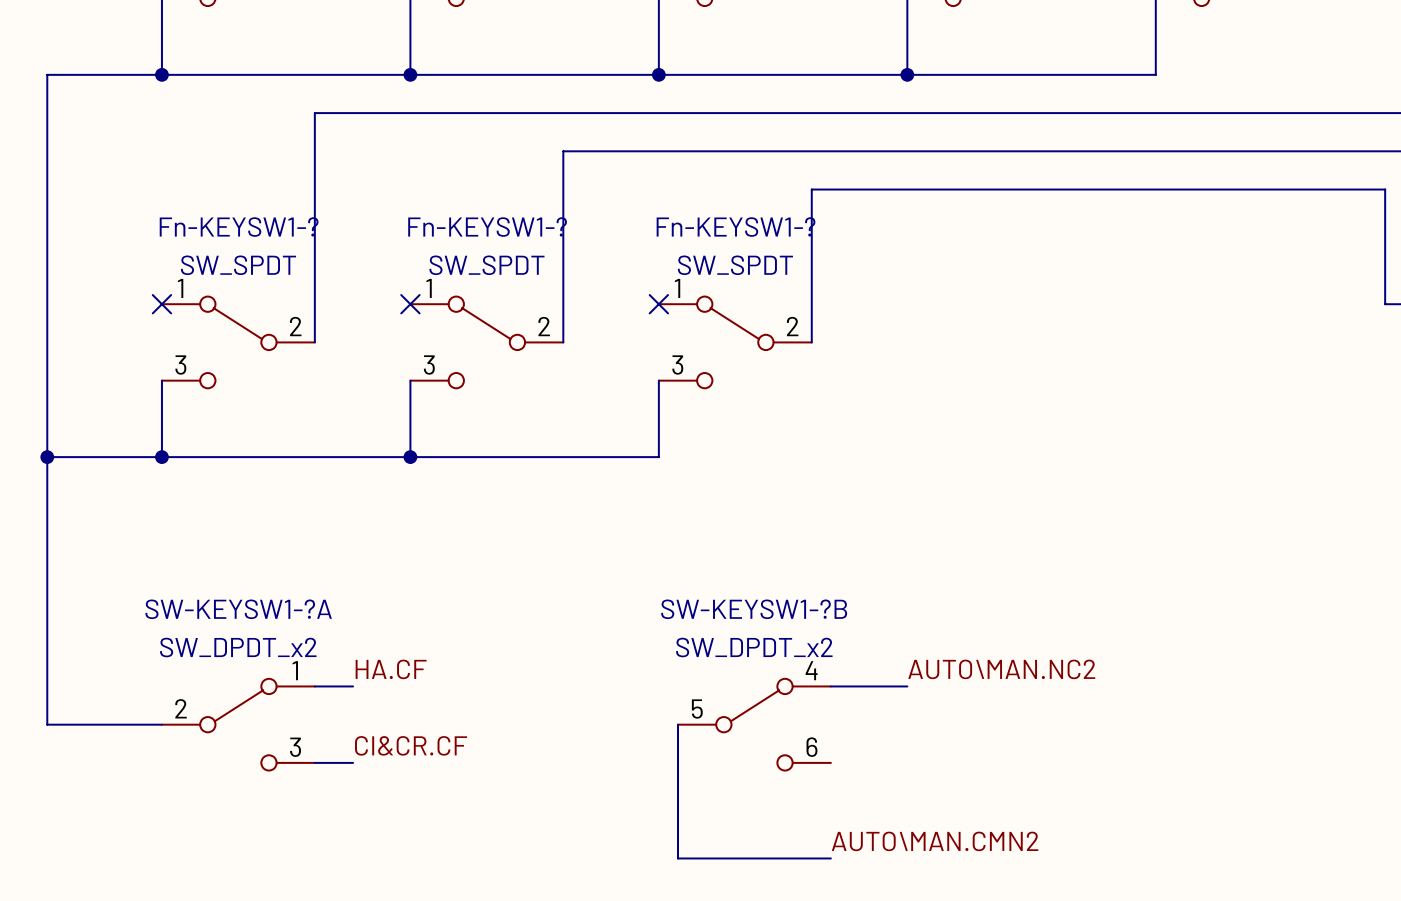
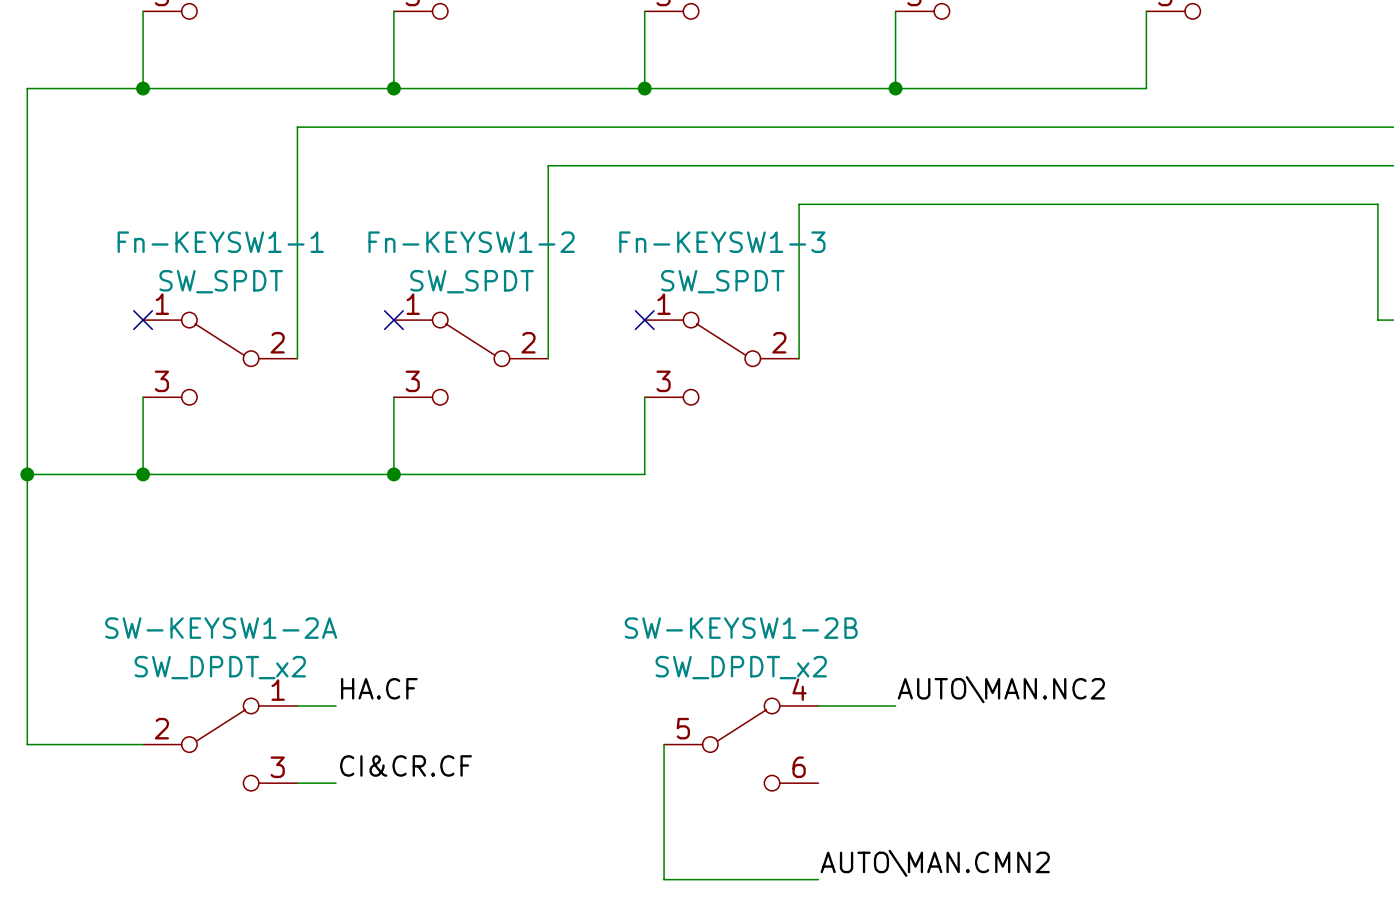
Fn-KEYSW1-? name: Fn-KEYSW1-? (239, 227) -> Fn-KEYSW1-1 (220, 242)
Fn-KEYSW1-? name: Fn-KEYSW1-? (487, 227) -> Fn-KEYSW1-2 (471, 242)
Fn-KEYSW1-? name: Fn-KEYSW1-? (736, 227) -> Fn-KEYSW1-3 (722, 242)
SW-KEYSW1-?A name: SW-KEYSW1-?A (238, 609) -> SW-KEYSW1-2A (221, 628)
SW-KEYSW1-?B name: SW-KEYSW1-?B (754, 609) -> SW-KEYSW1-2B (741, 628)

